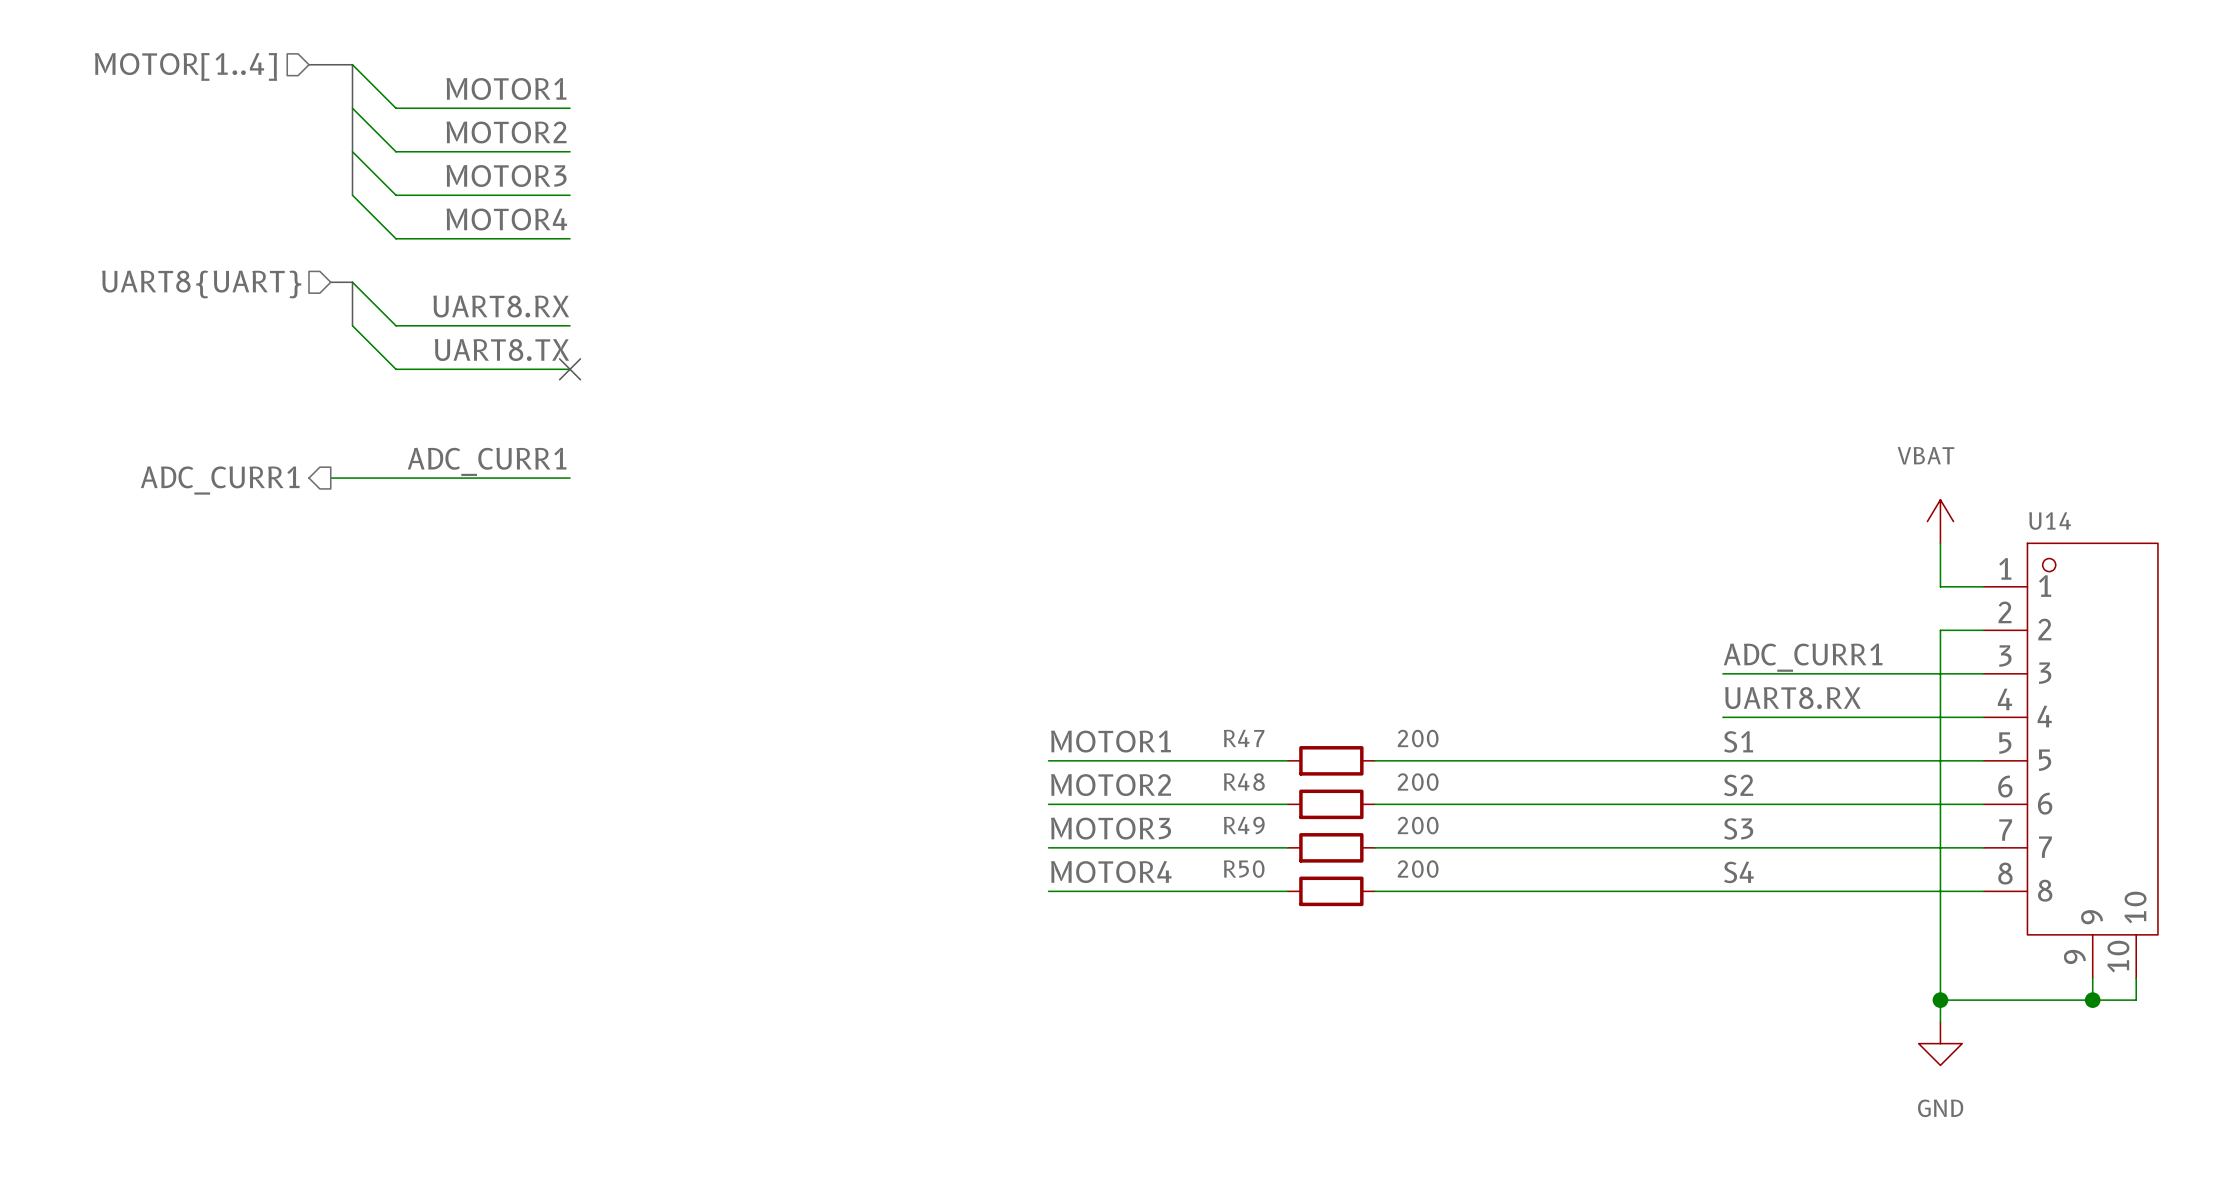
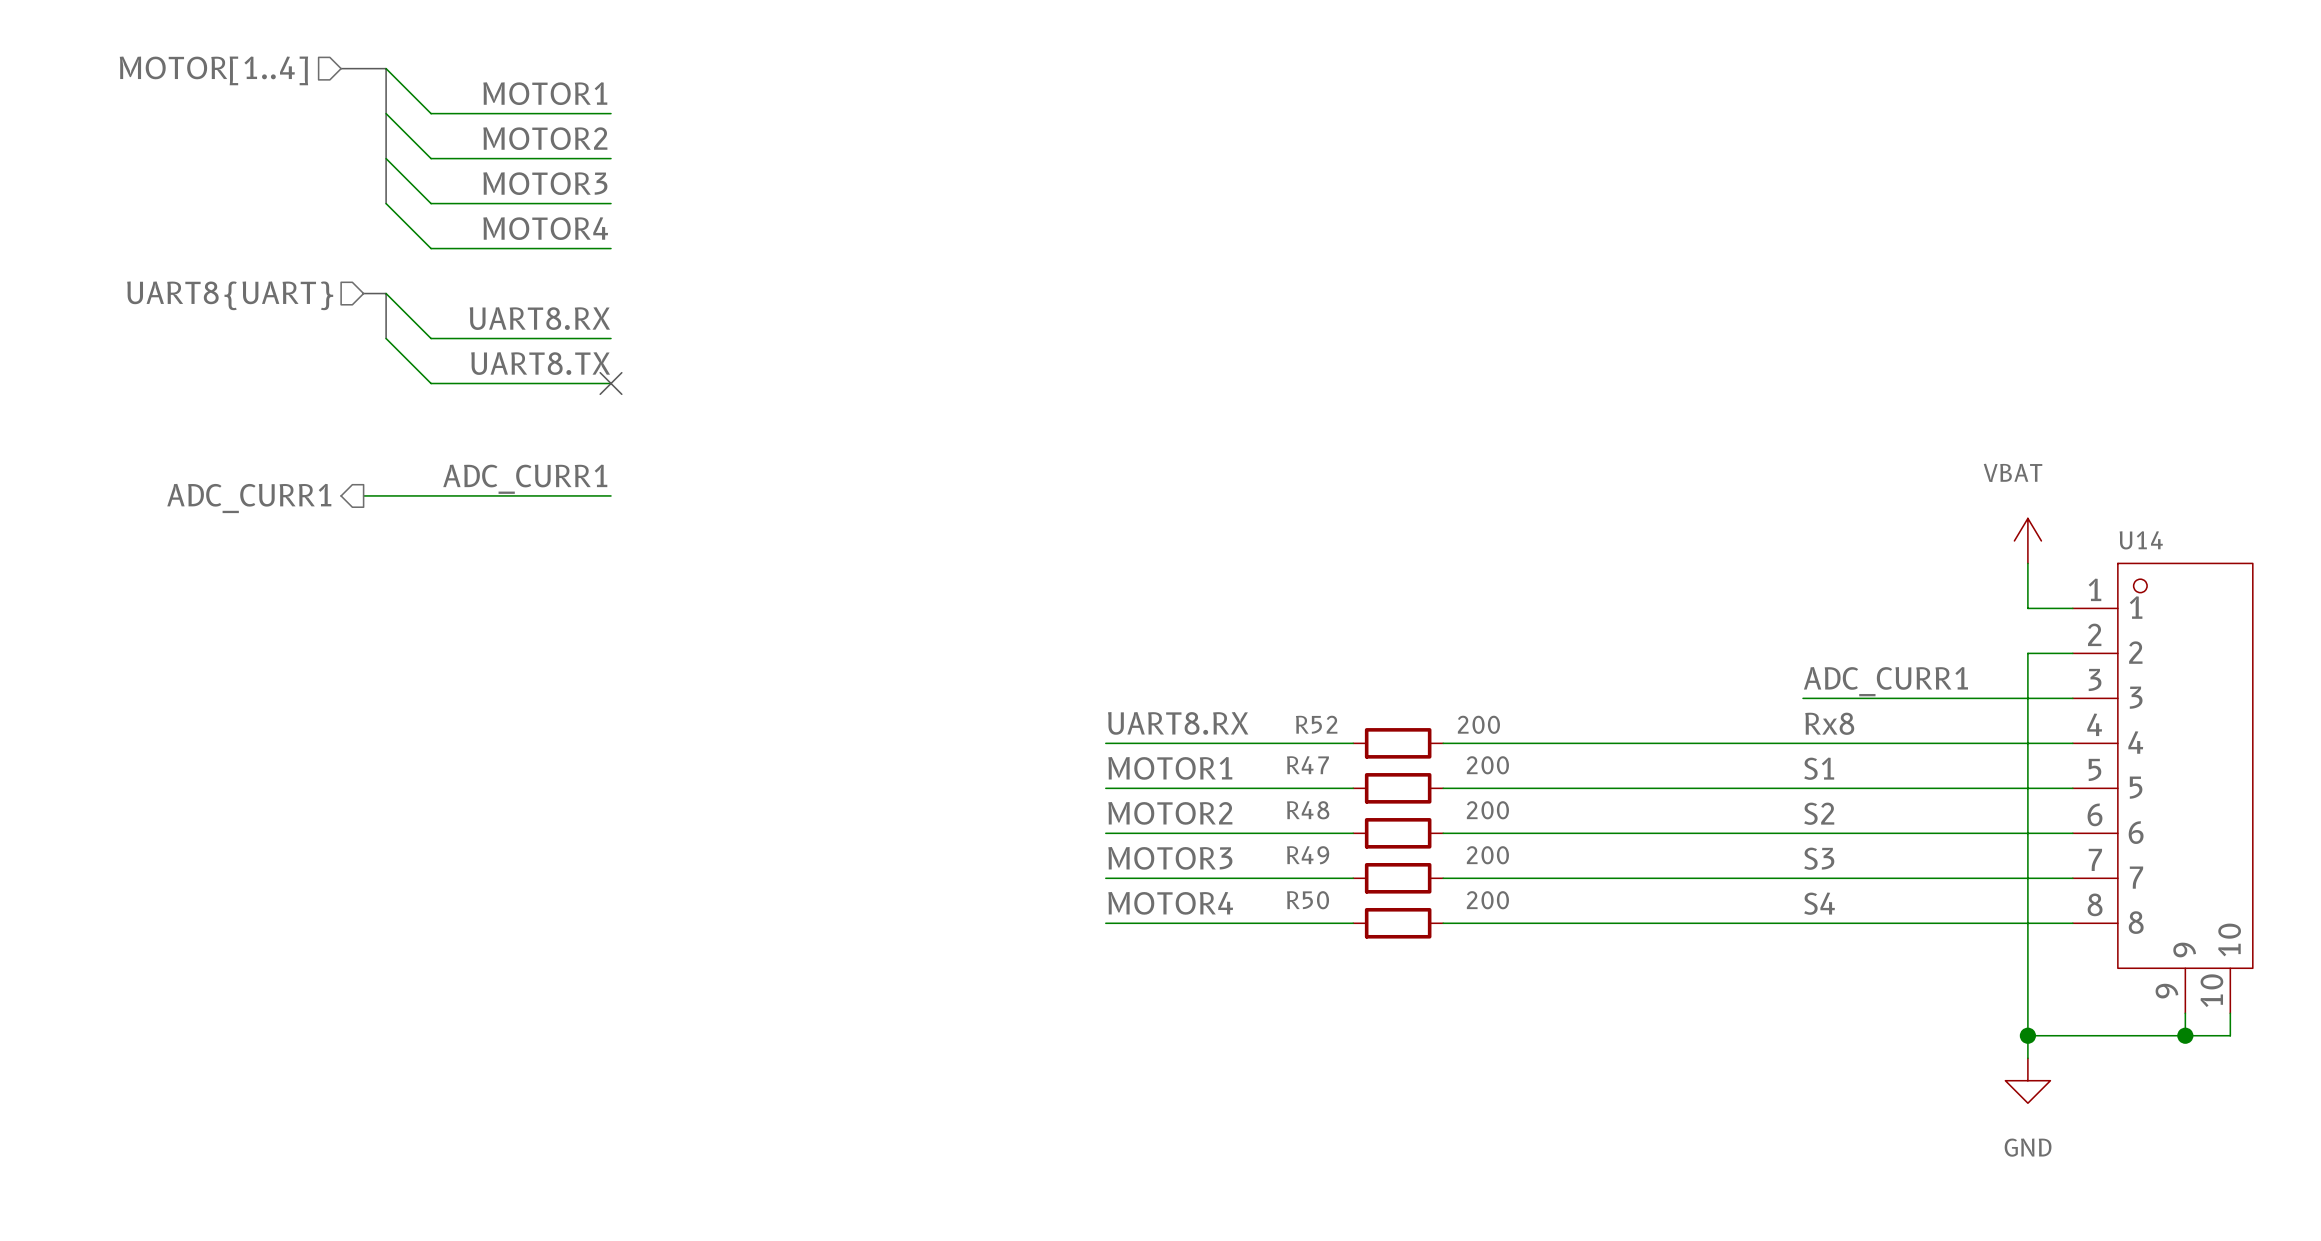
label: none -> UART8.RX (1178, 723)
label: UART8.RX (1792, 698) -> Rx8 (1829, 723)
wire: none -> (1105, 743) (1353, 743)
R52: none -> 200 (1398, 743)
wire: none -> (1443, 743) (1803, 743)

